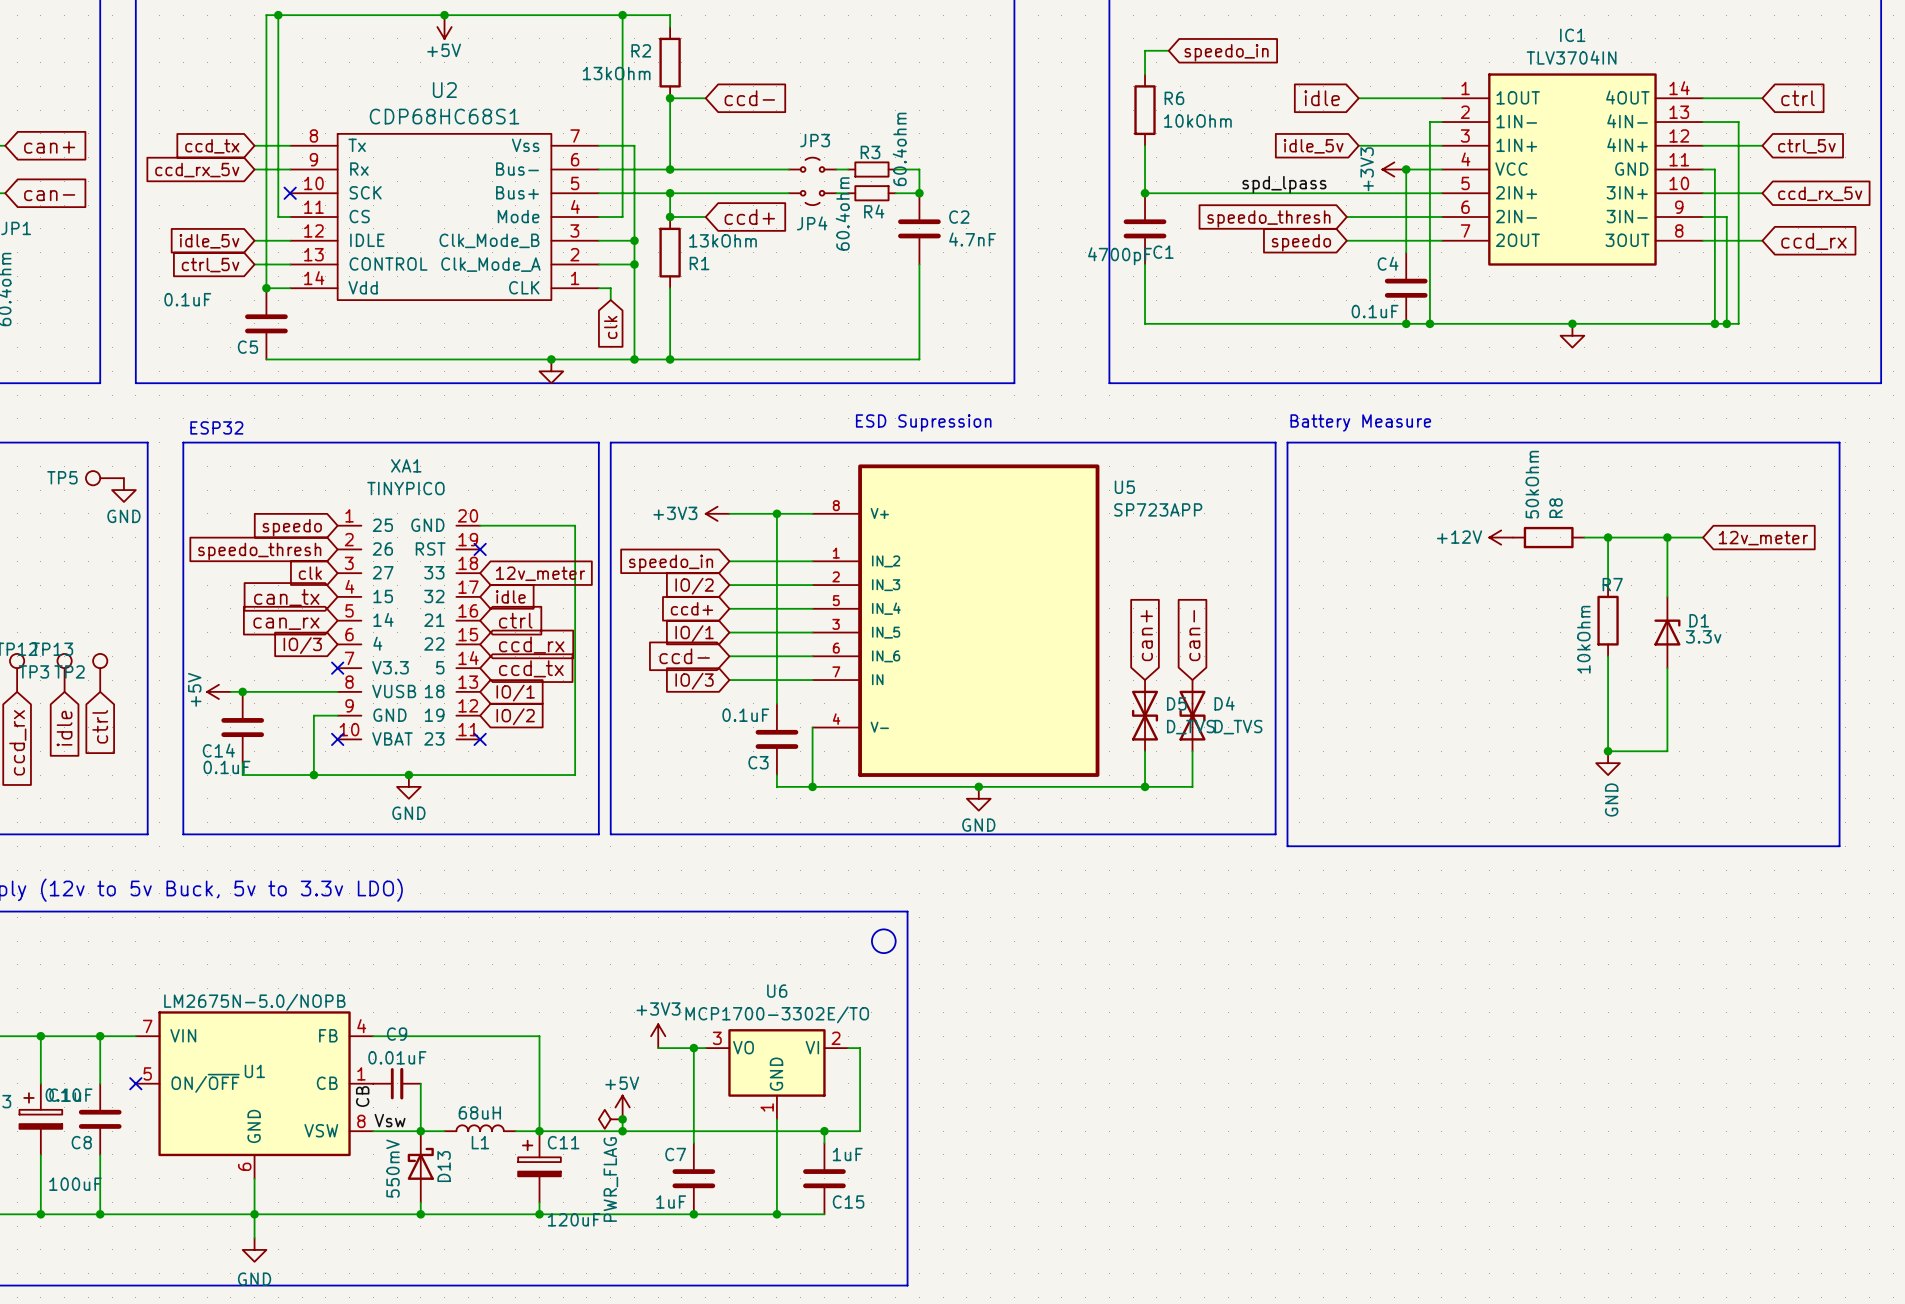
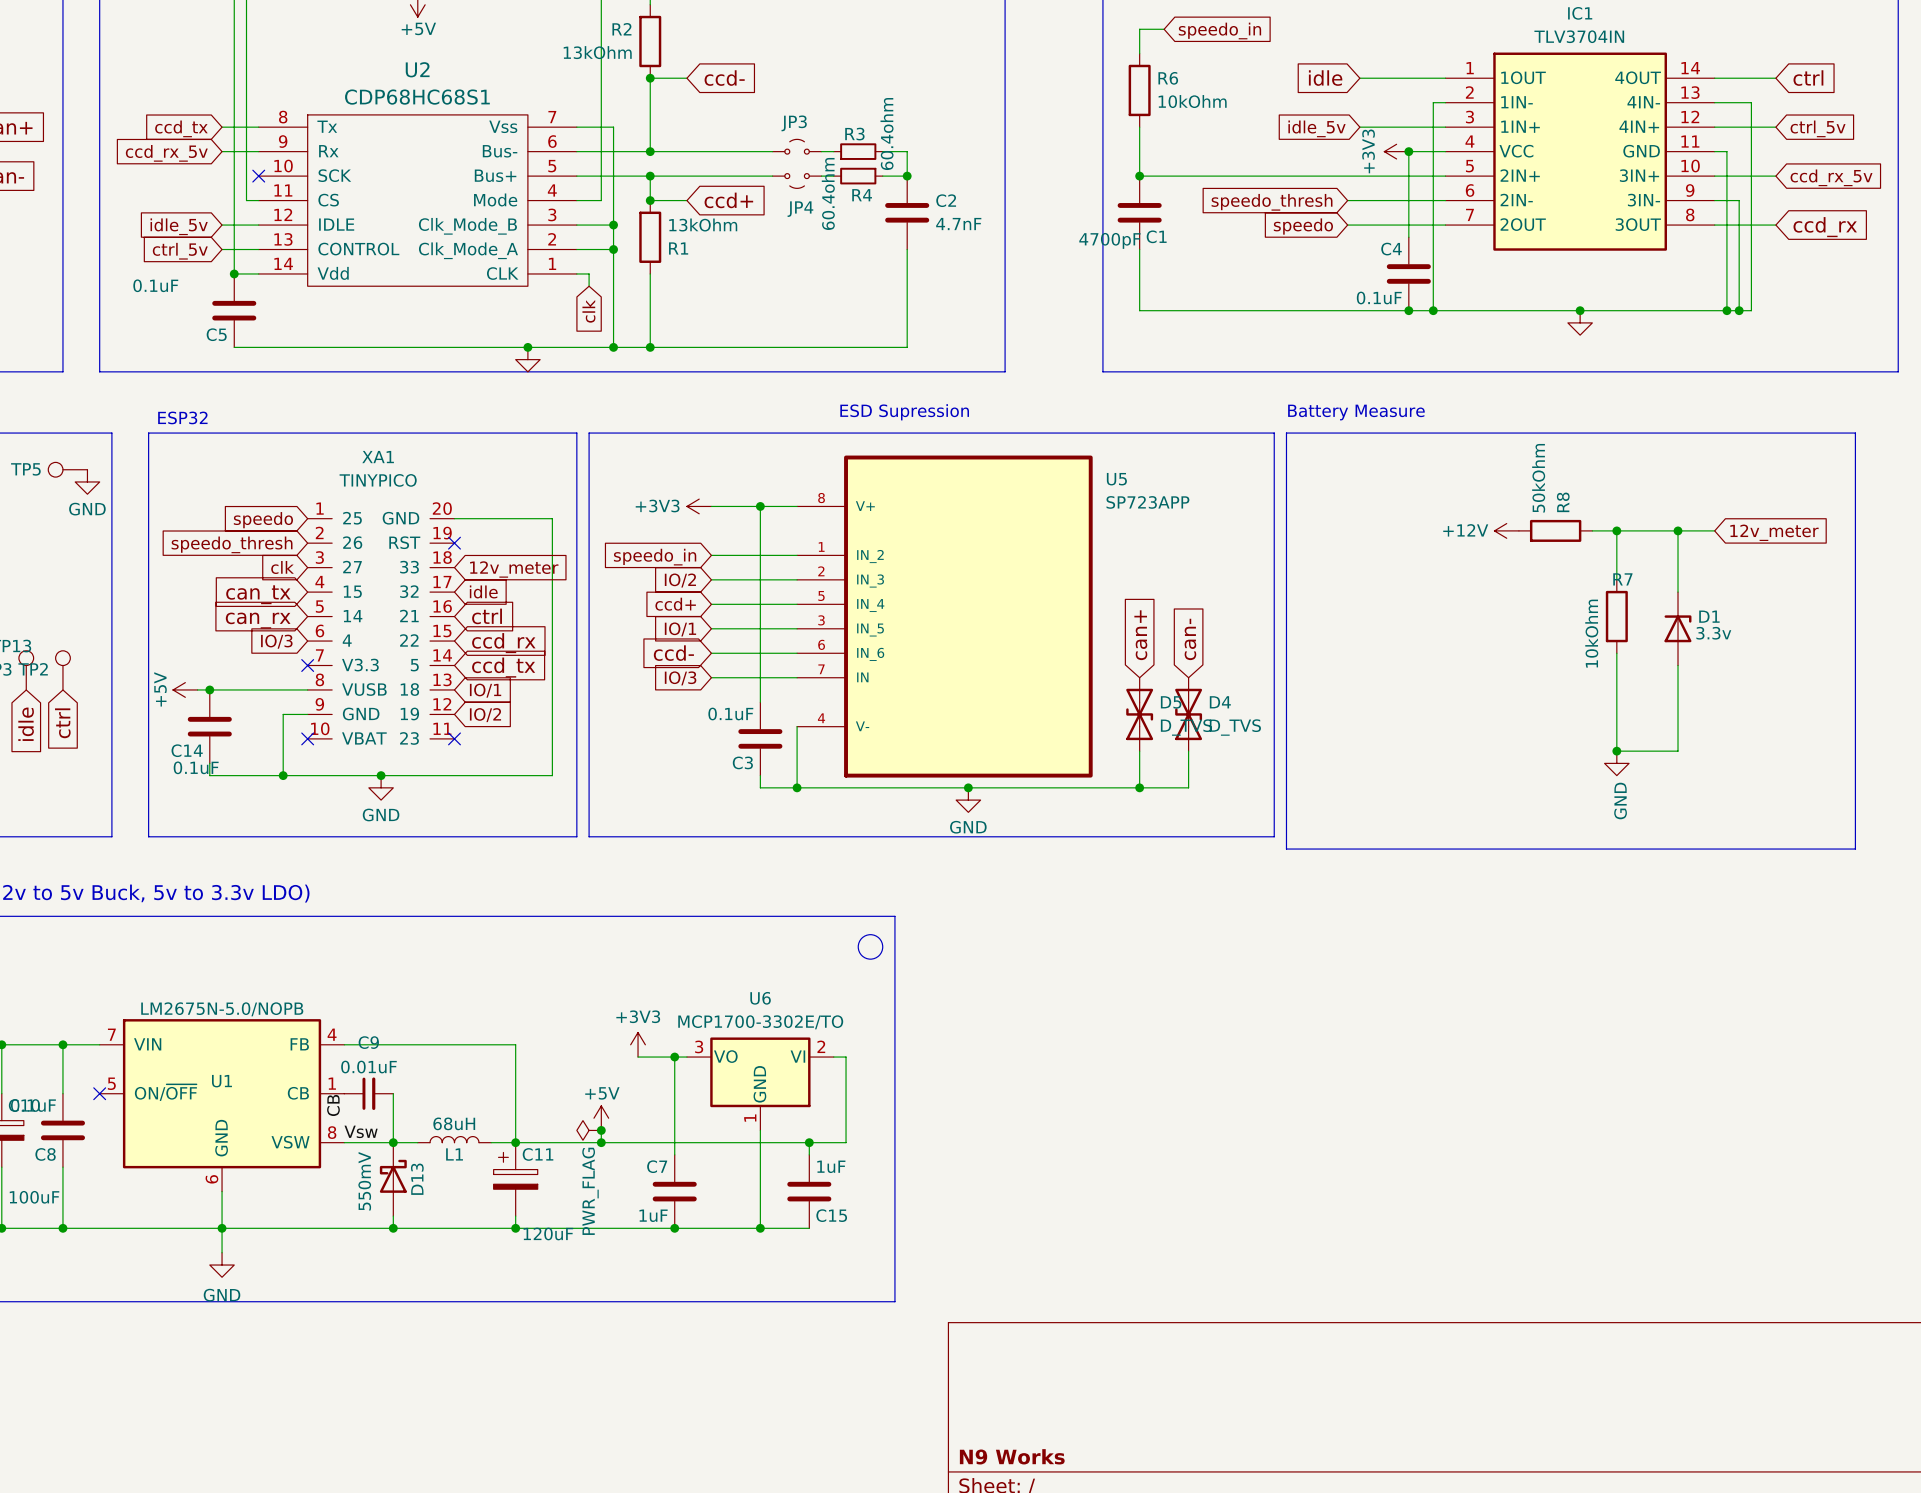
label: spd_lpass (1284, 184) -> none

